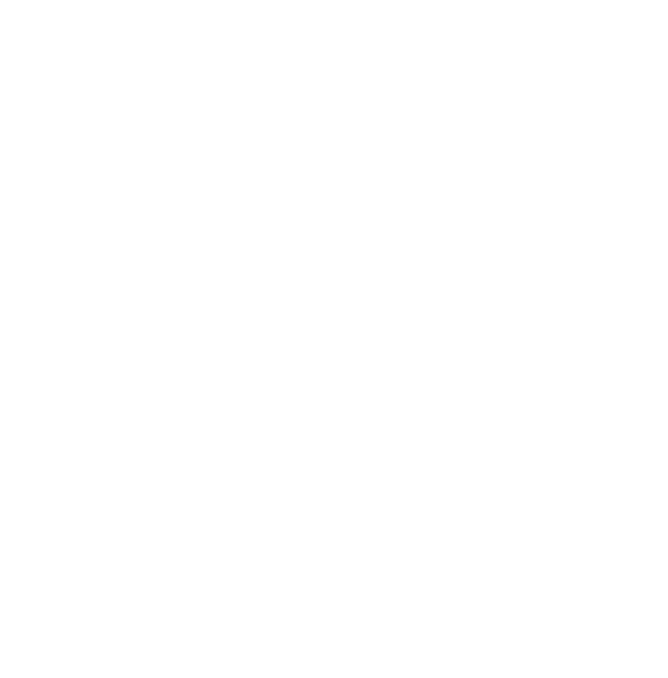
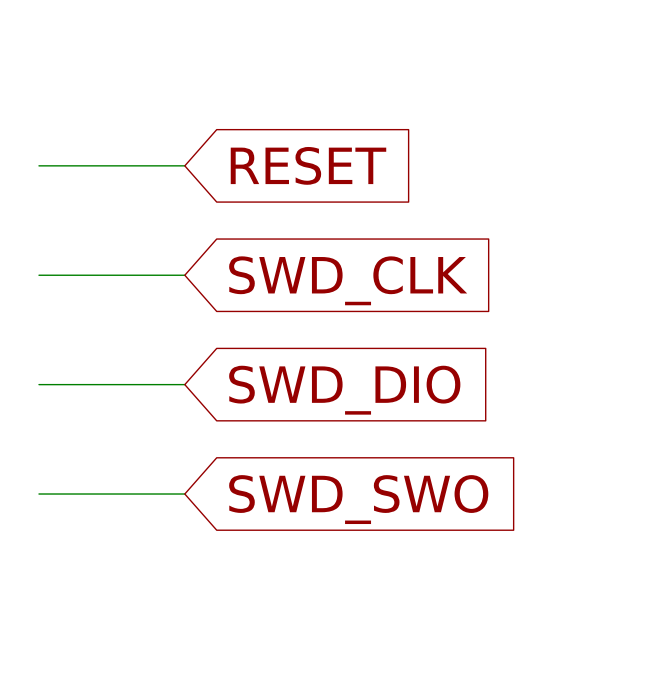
wire: none -> (38, 165) (184, 165)
global label: none -> RESET (308, 165)
wire: none -> (38, 275) (184, 275)
global label: none -> SWD_CLK (348, 280)
wire: none -> (38, 384) (184, 384)
global label: none -> SWD_DIO (344, 390)
wire: none -> (38, 494) (184, 494)
global label: none -> SWD_SWO (358, 499)

